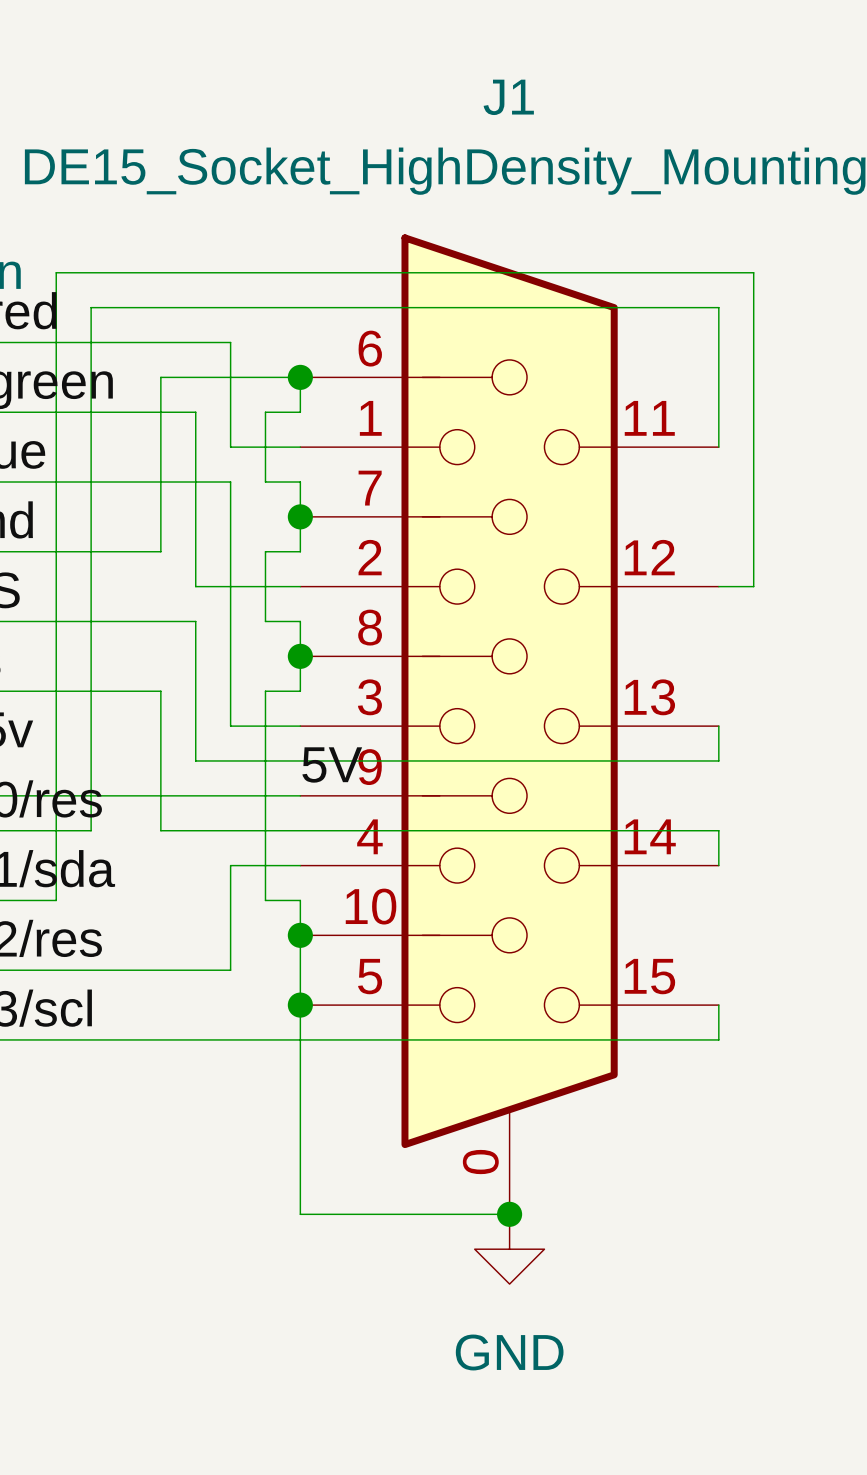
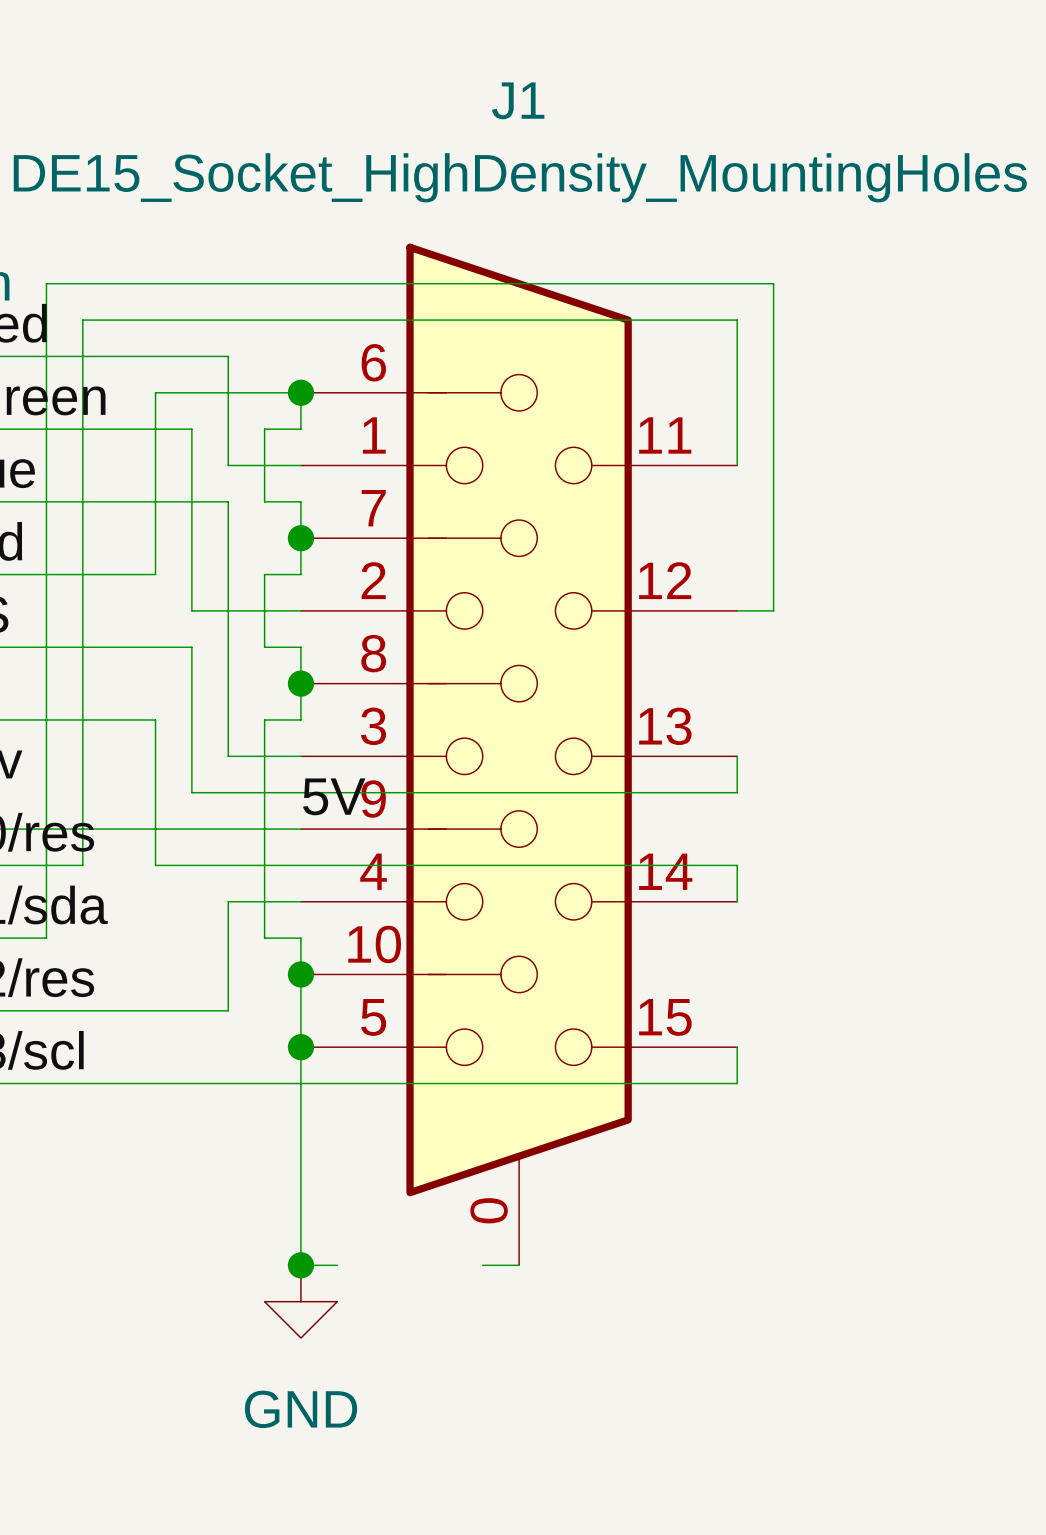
junction: none -> (300, 1265)
wire: (335, 1214) (474, 1214) -> none
junction: (509, 1214) -> none
power symbol position: GND (509, 1249) -> GND (300, 1301)

